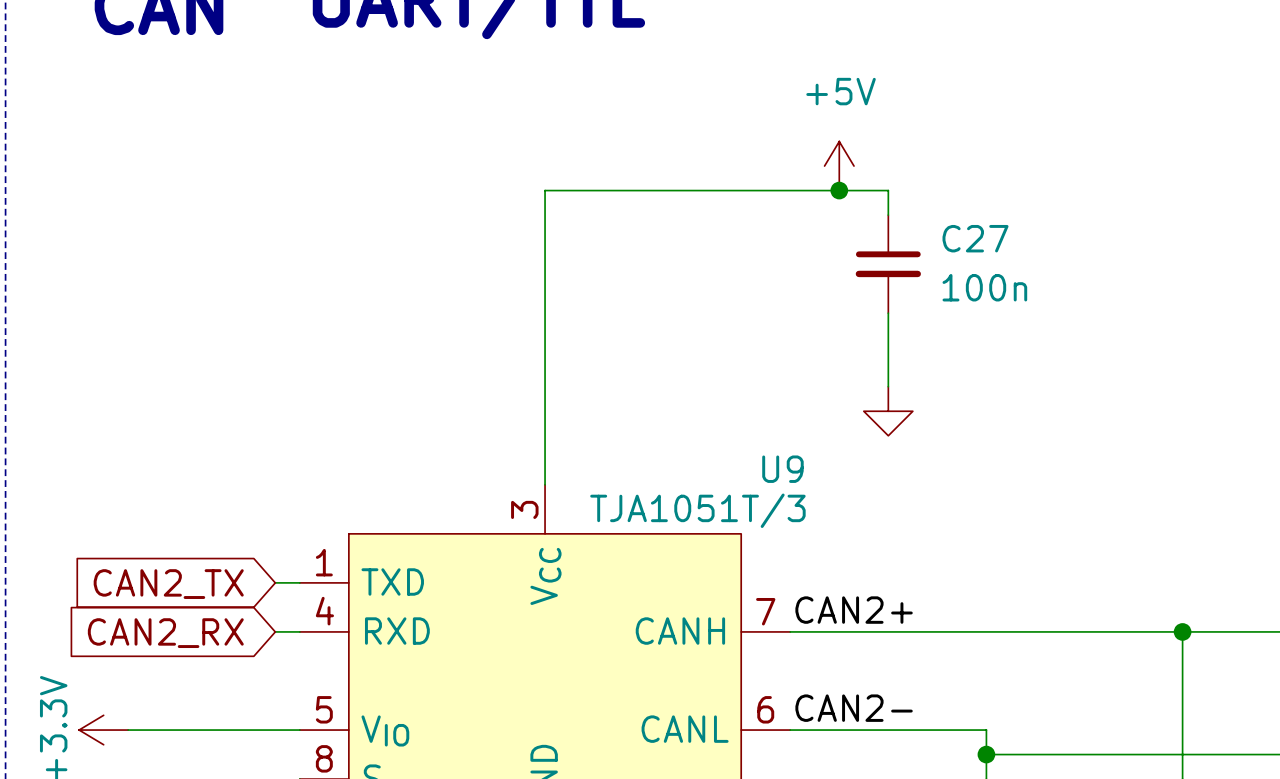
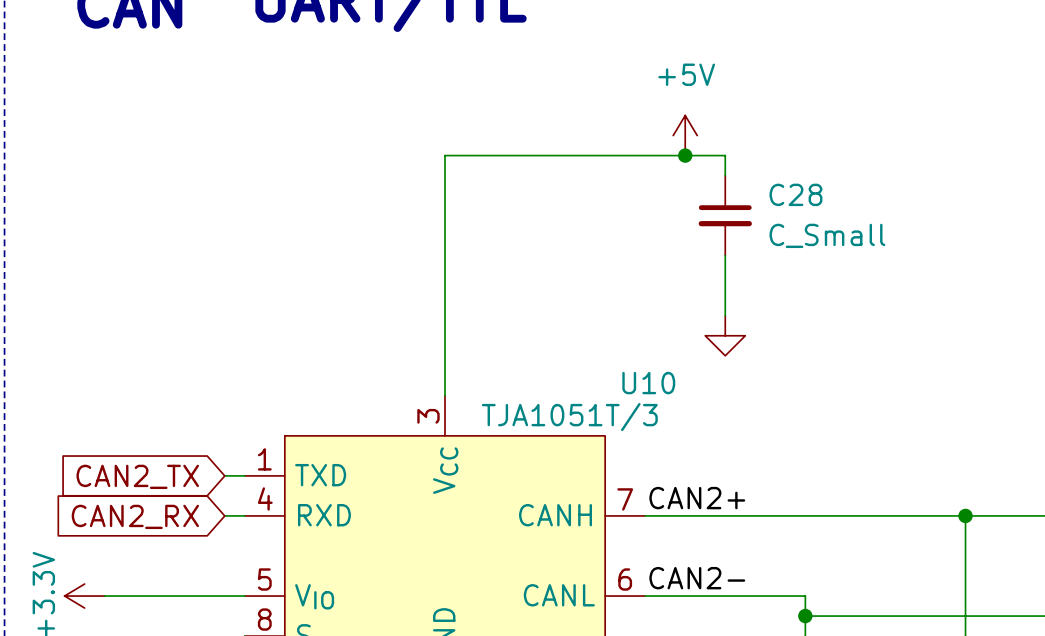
C27 name: C27 (975, 238) -> C28 (795, 194)
C27 value: 100n (984, 287) -> C_Small (827, 235)
U9 name: U9 (782, 469) -> U10 (648, 383)

